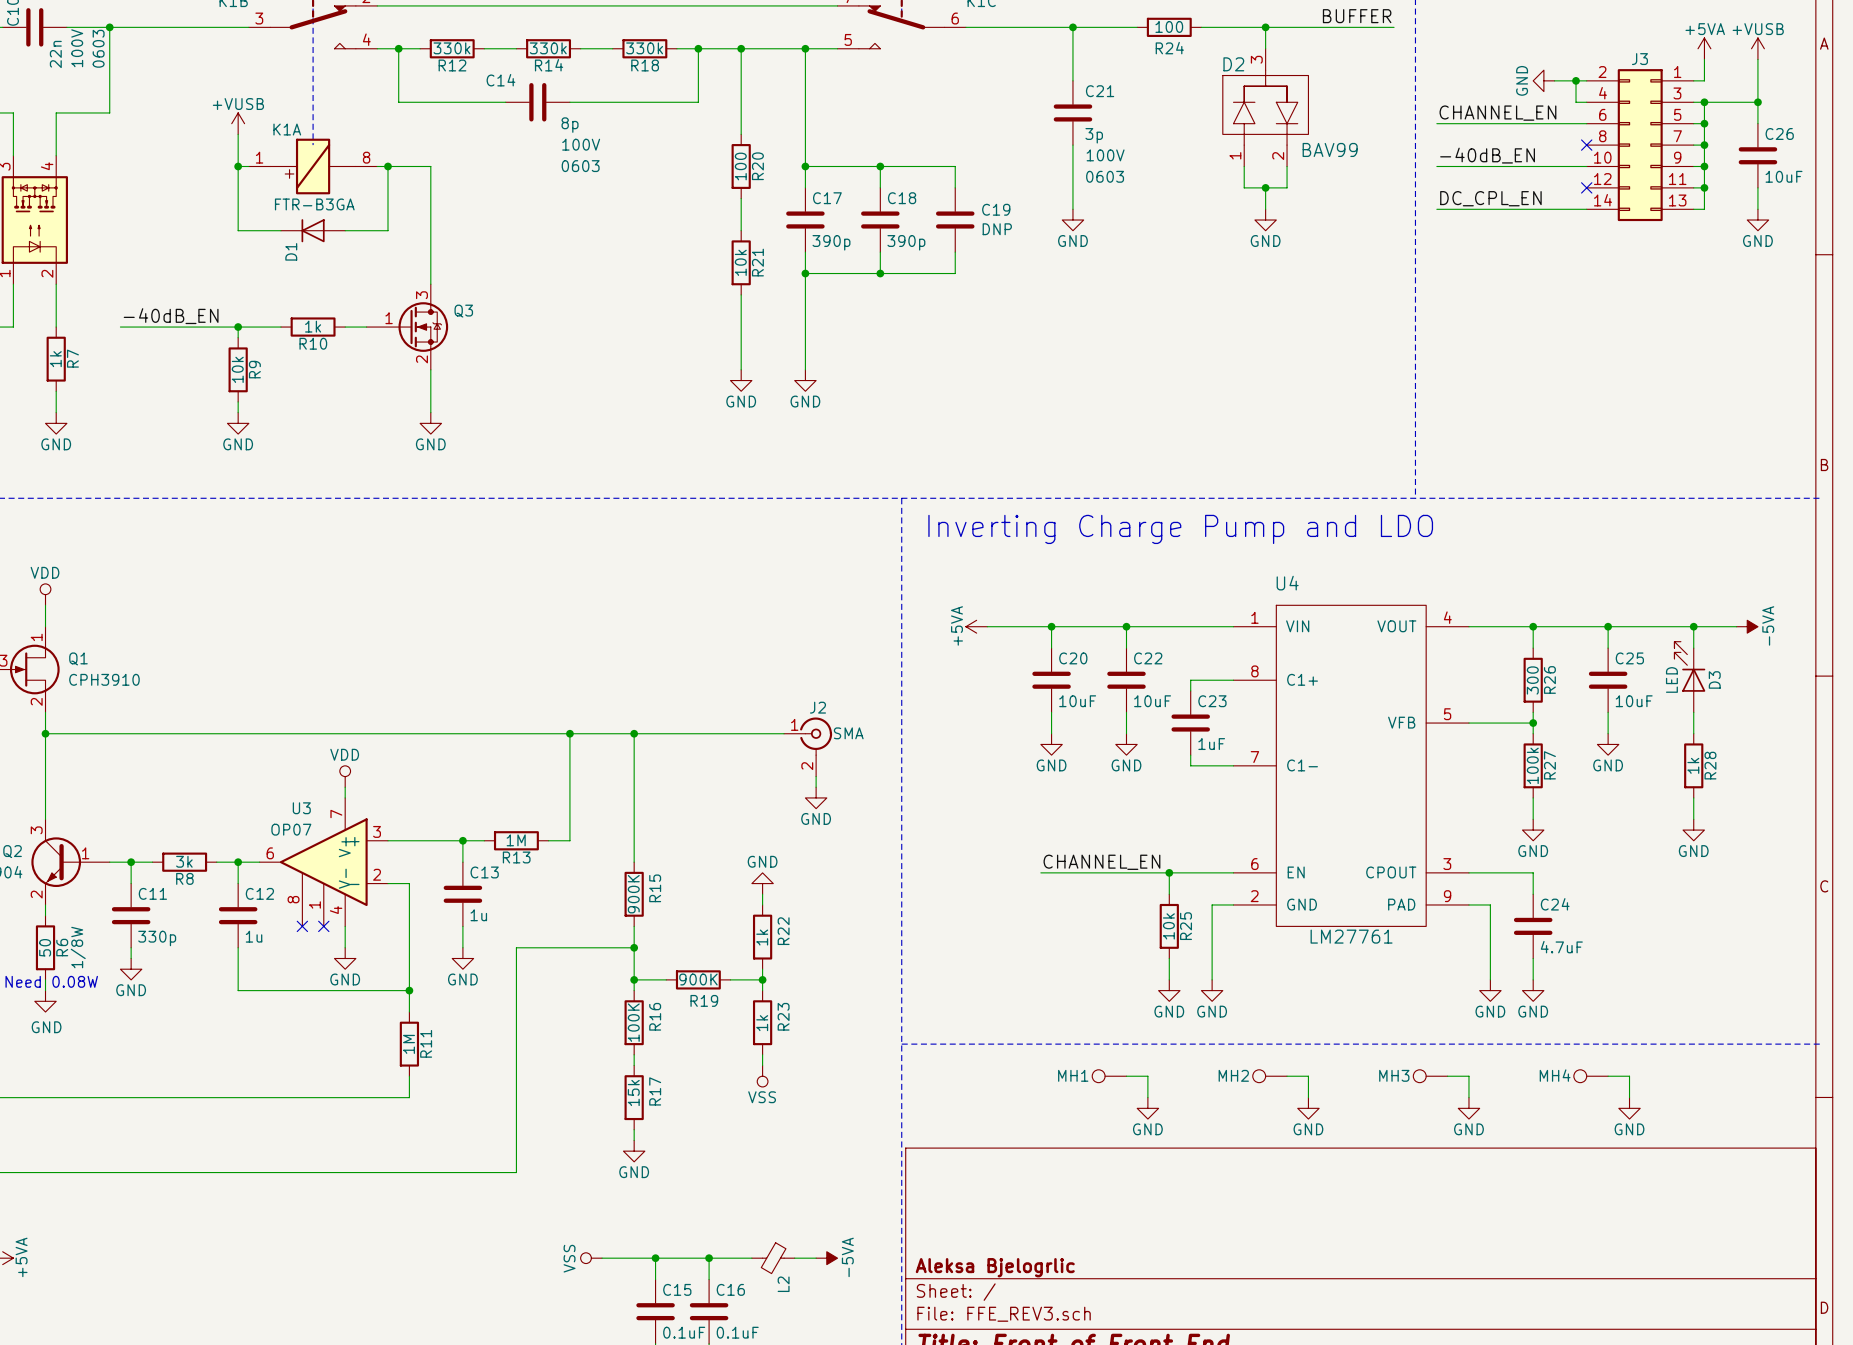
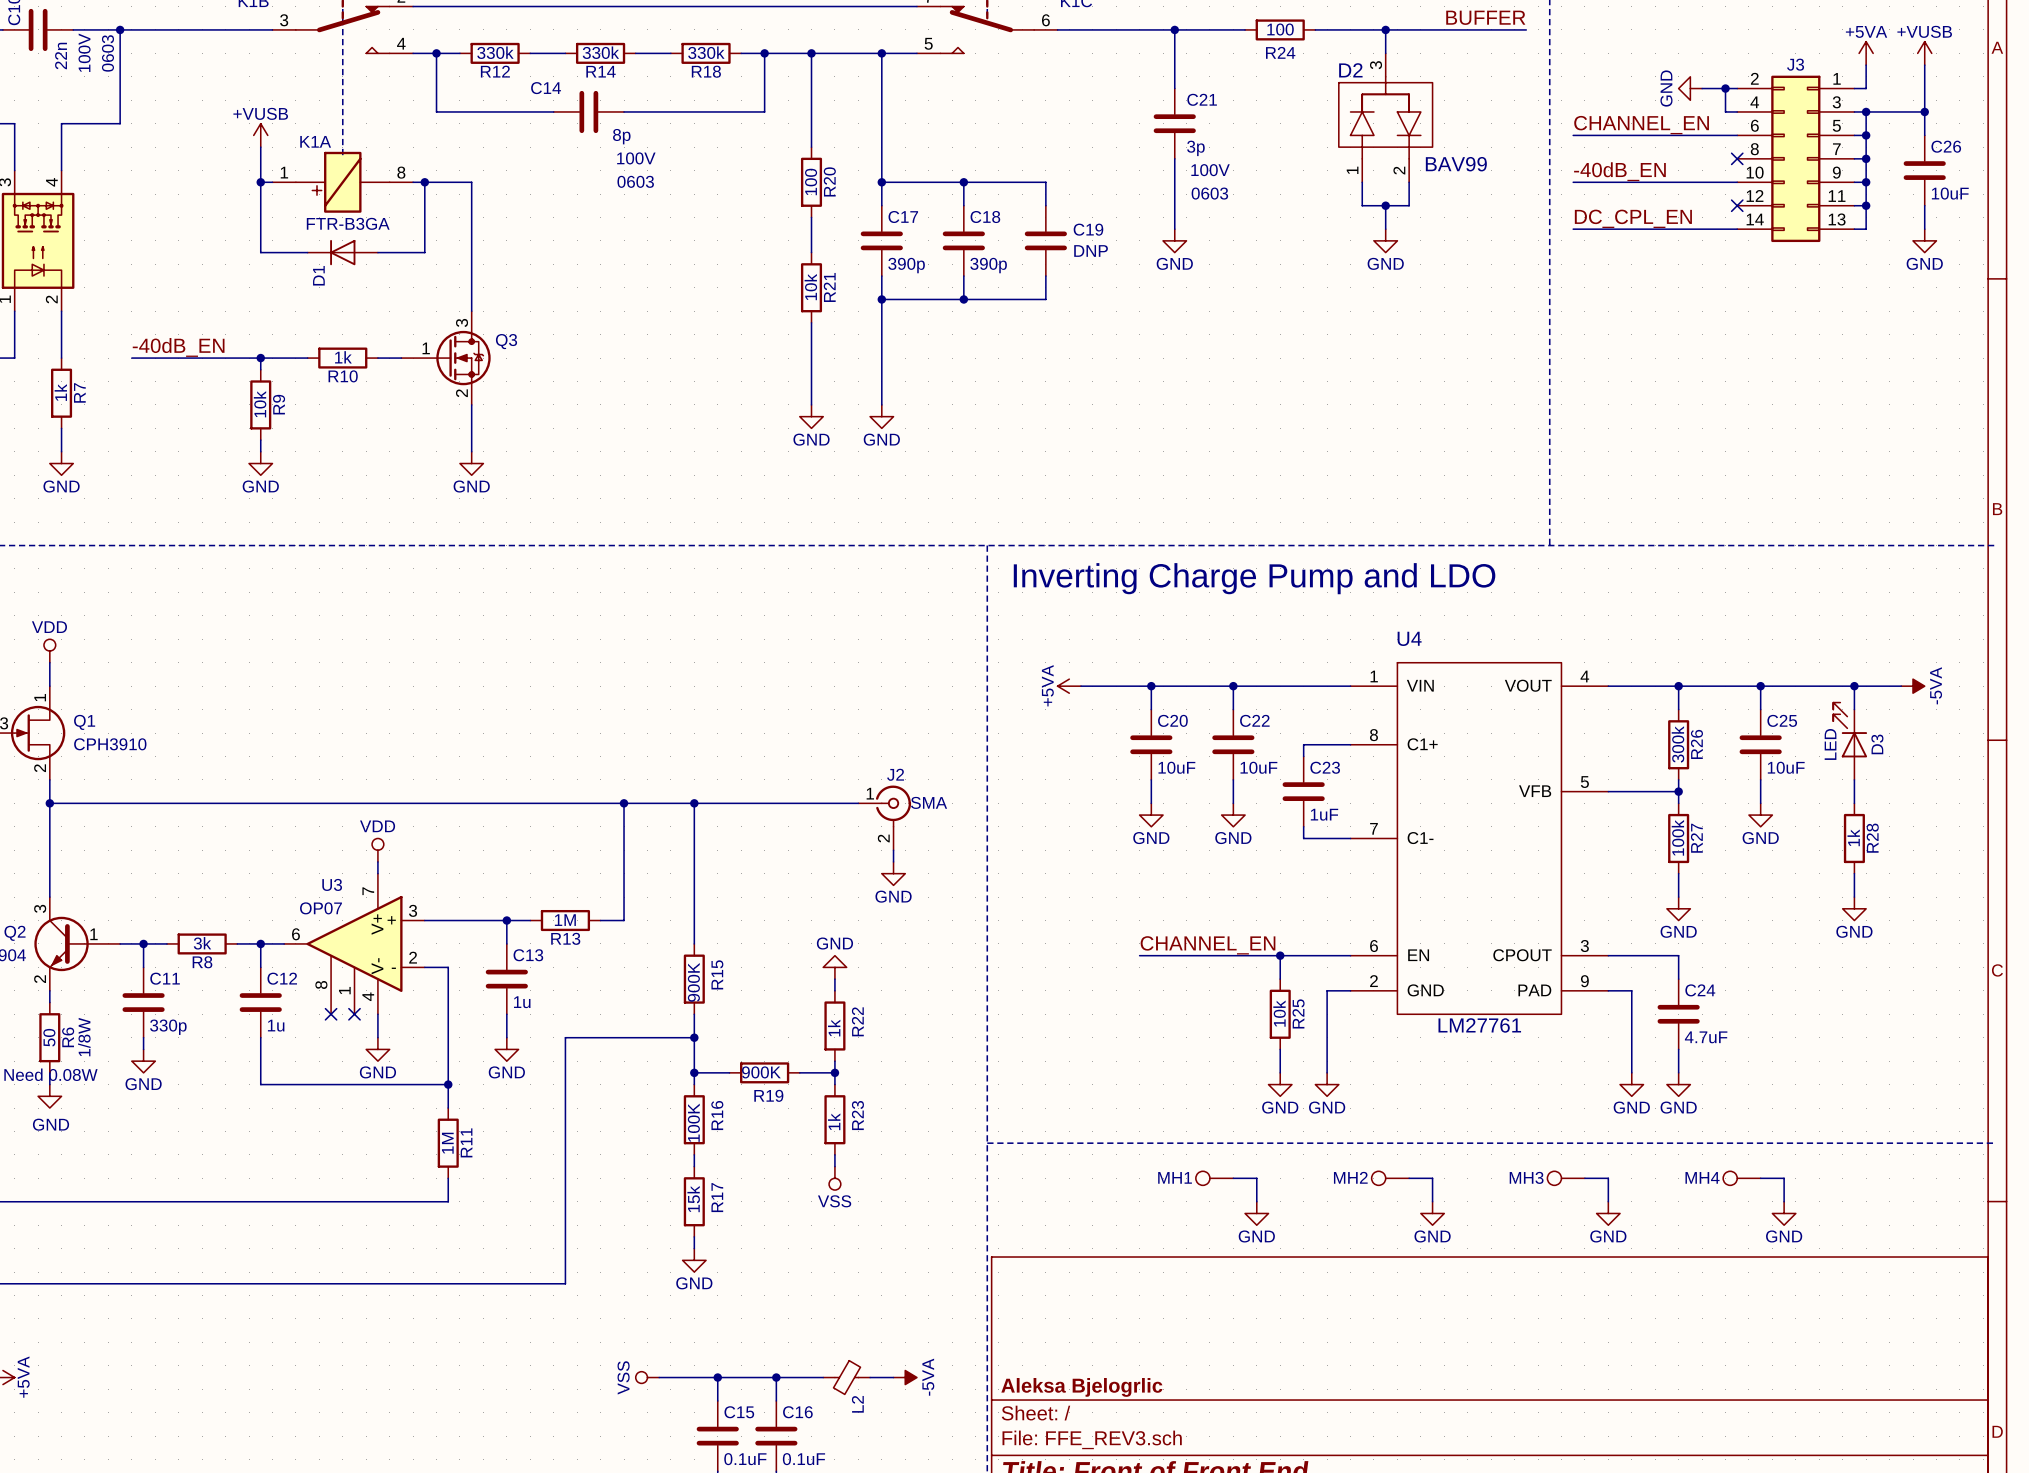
R26 value: 300 (1532, 680) -> 300k (1677, 744)

